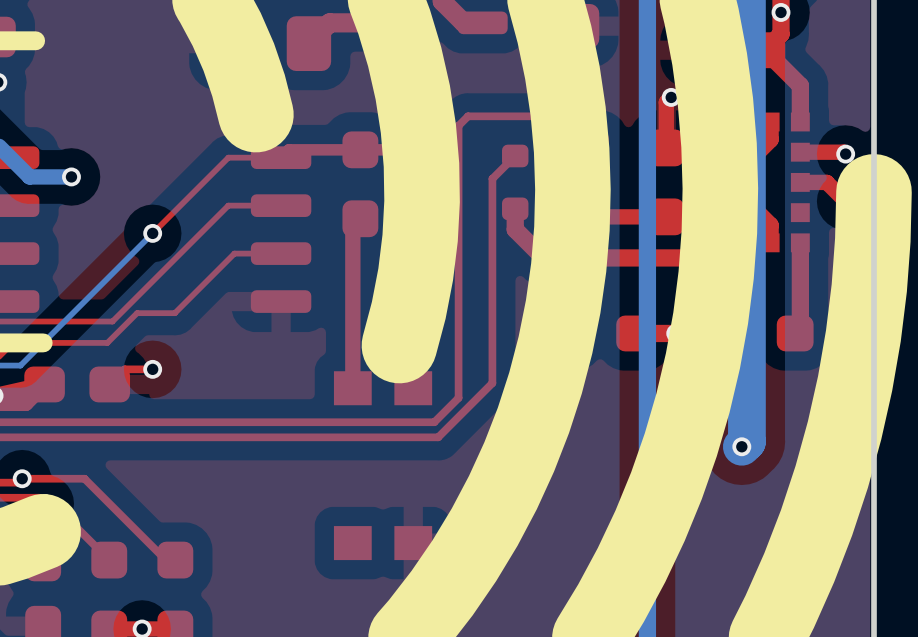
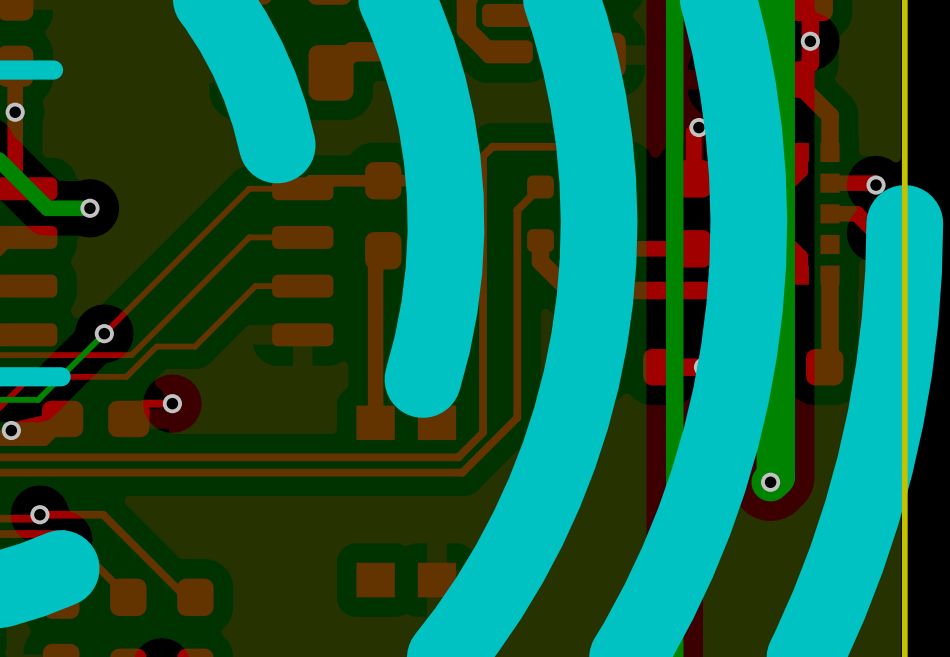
top track: none -> (172, 265) (104, 333)
bottom track: (152, 233) (85, 300) -> none
via position: (152, 233) -> (104, 333)

